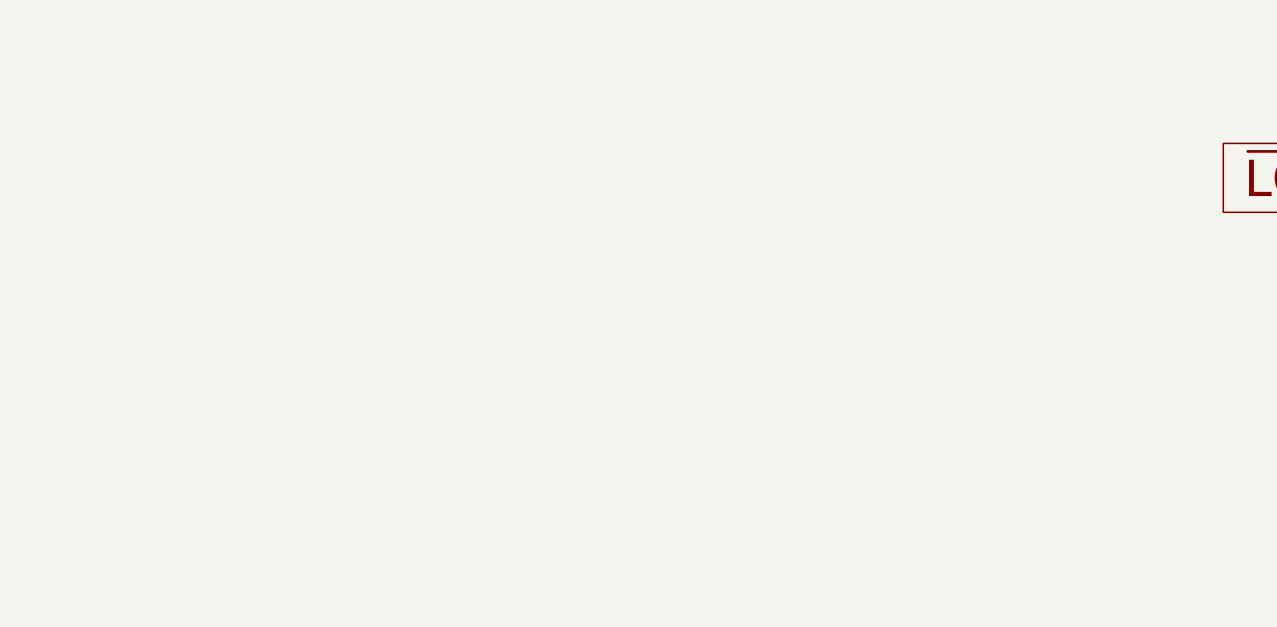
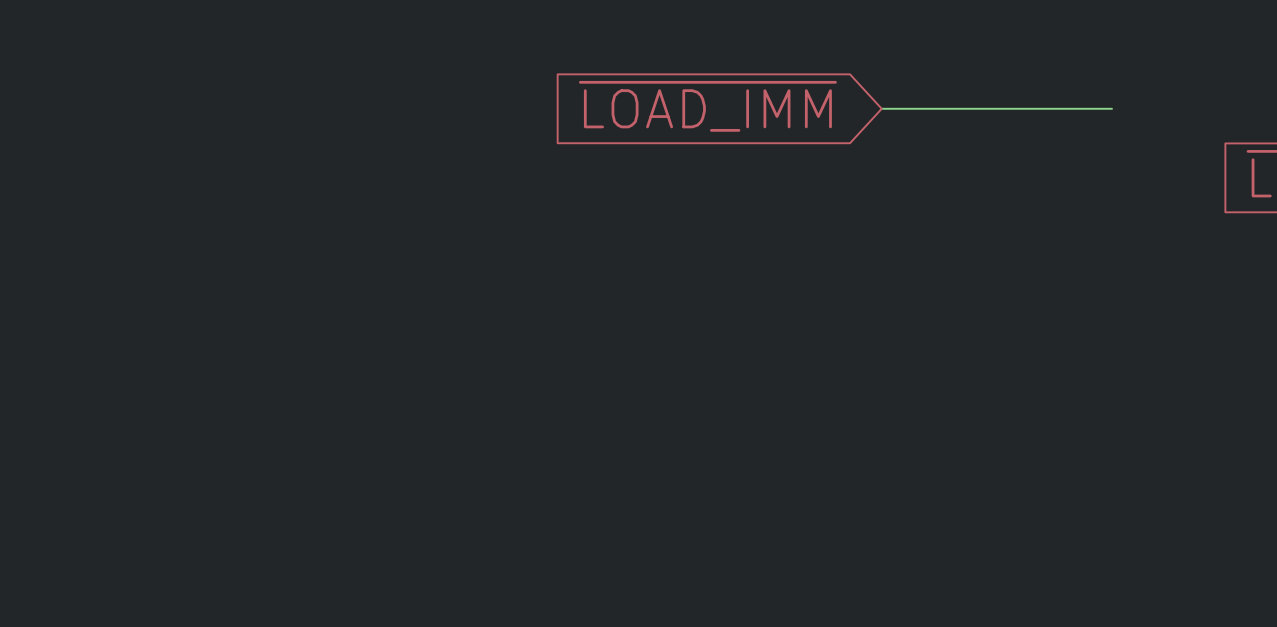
wire: none -> (881, 108) (1111, 108)
global label: none -> ~{LOAD_IMM} (707, 106)

